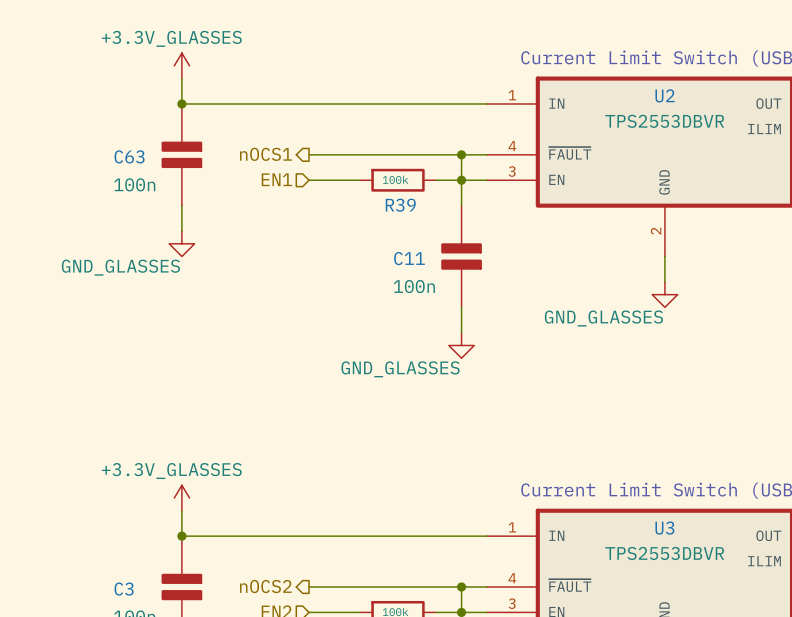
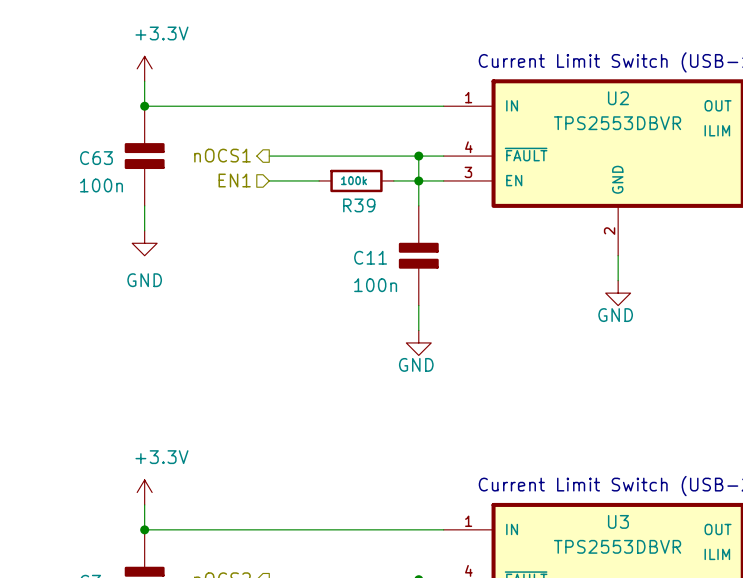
power symbol: +3.3V_GLASSES (181, 65) -> +3.3V (144, 68)
power symbol: GND_GLASSES (181, 243) -> GND (144, 243)
power symbol: GND_GLASSES (664, 294) -> GND (618, 293)
power symbol: GND_GLASSES (461, 345) -> GND (418, 342)
power symbol: +3.3V_GLASSES (181, 498) -> +3.3V (144, 492)

